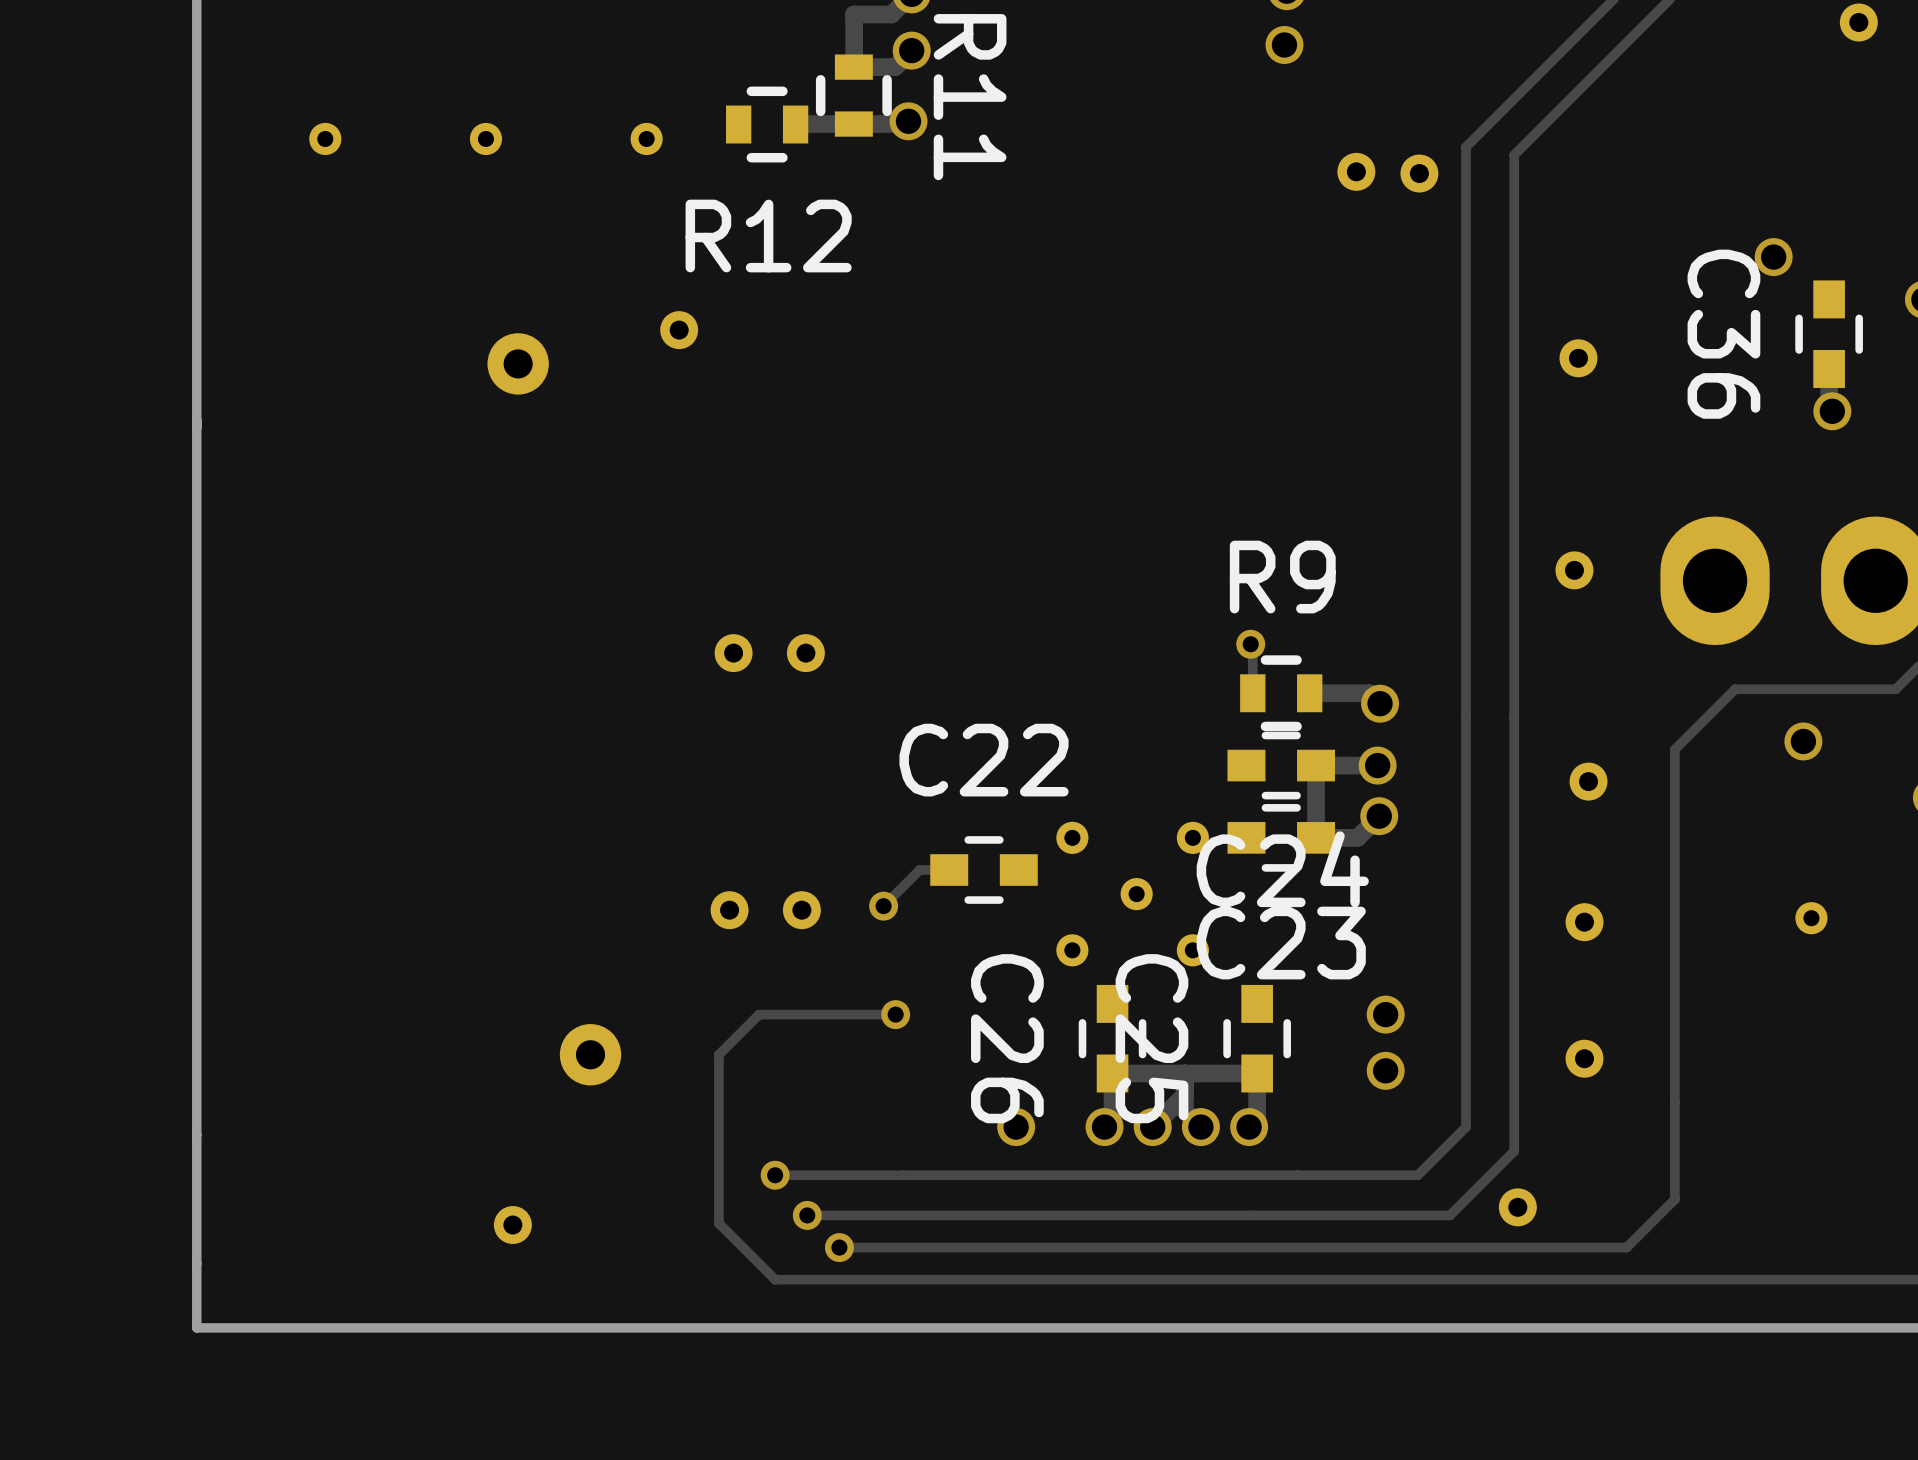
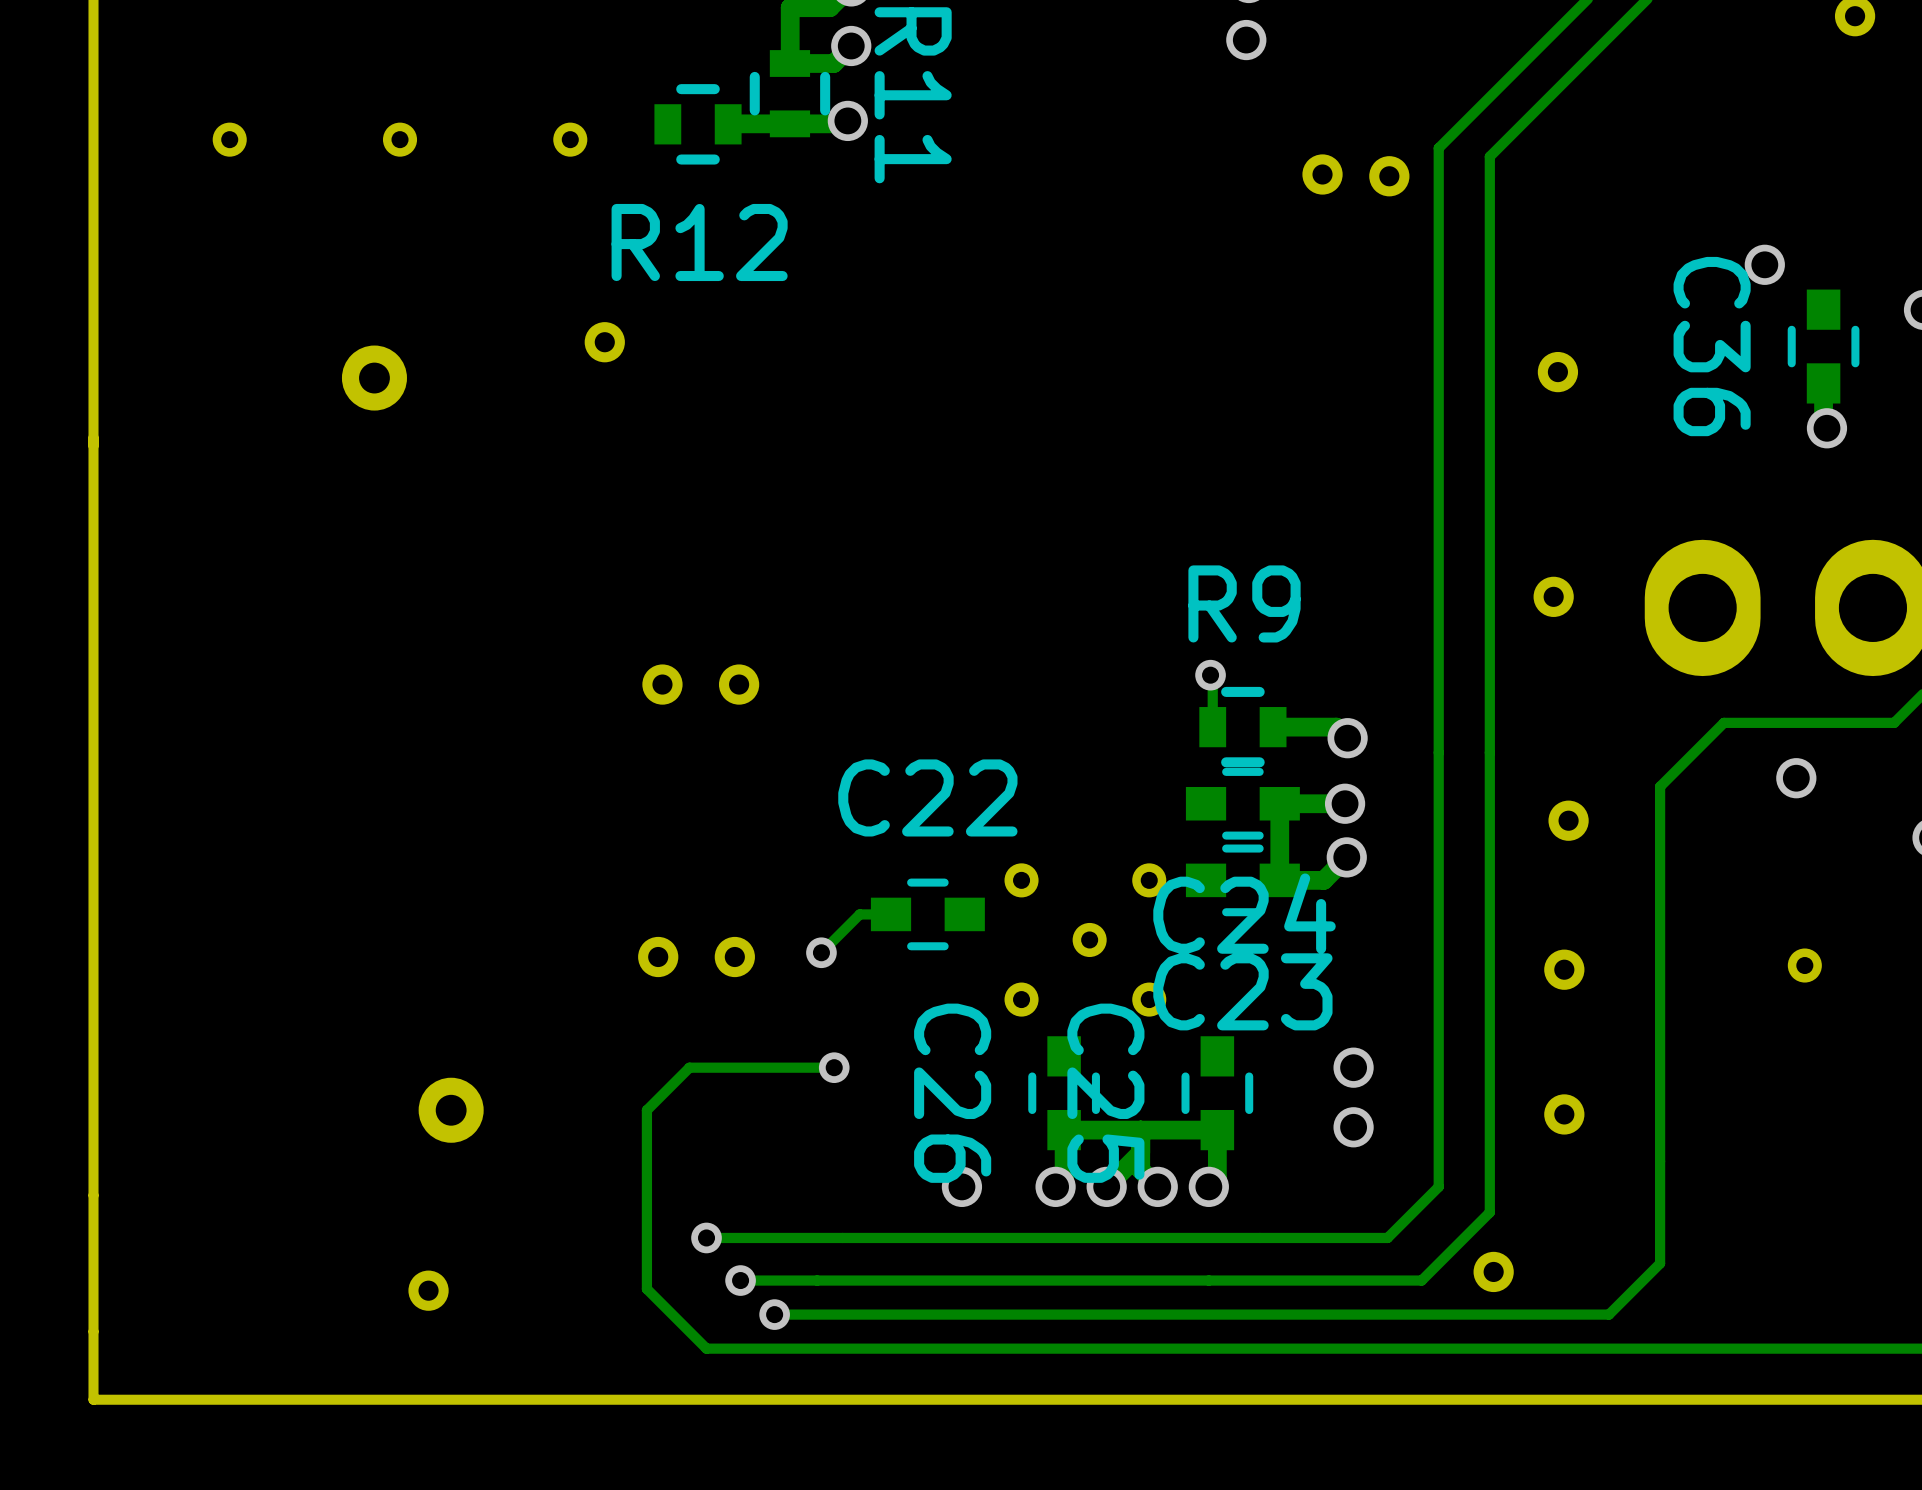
part position: (518, 363) -> (374, 378)
part position: (590, 1054) -> (451, 1110)

